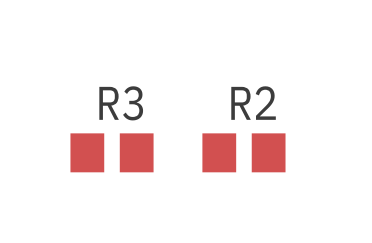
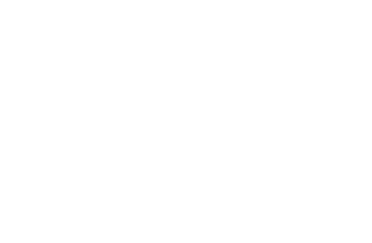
R3: (112, 152) -> none
R2: (243, 152) -> none

